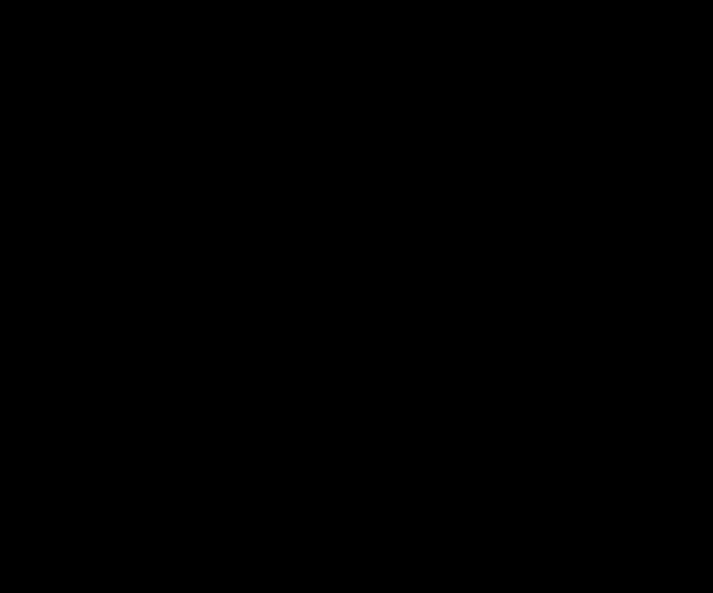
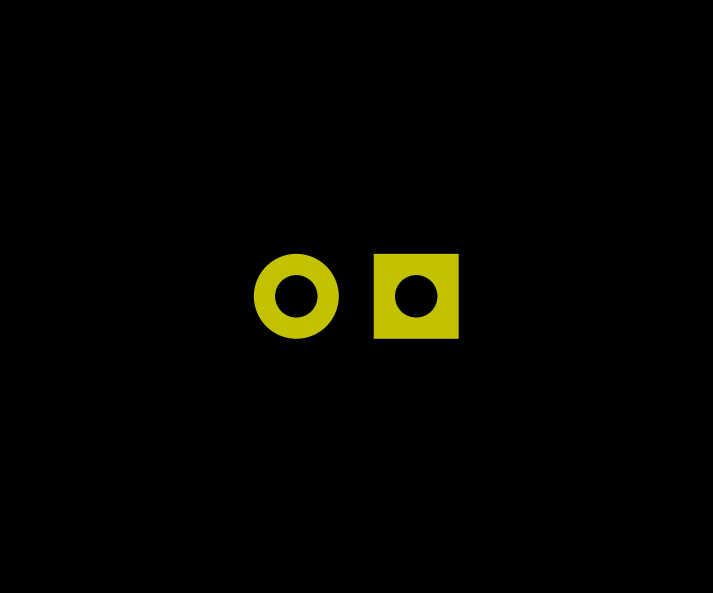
part: none -> (356, 296)

